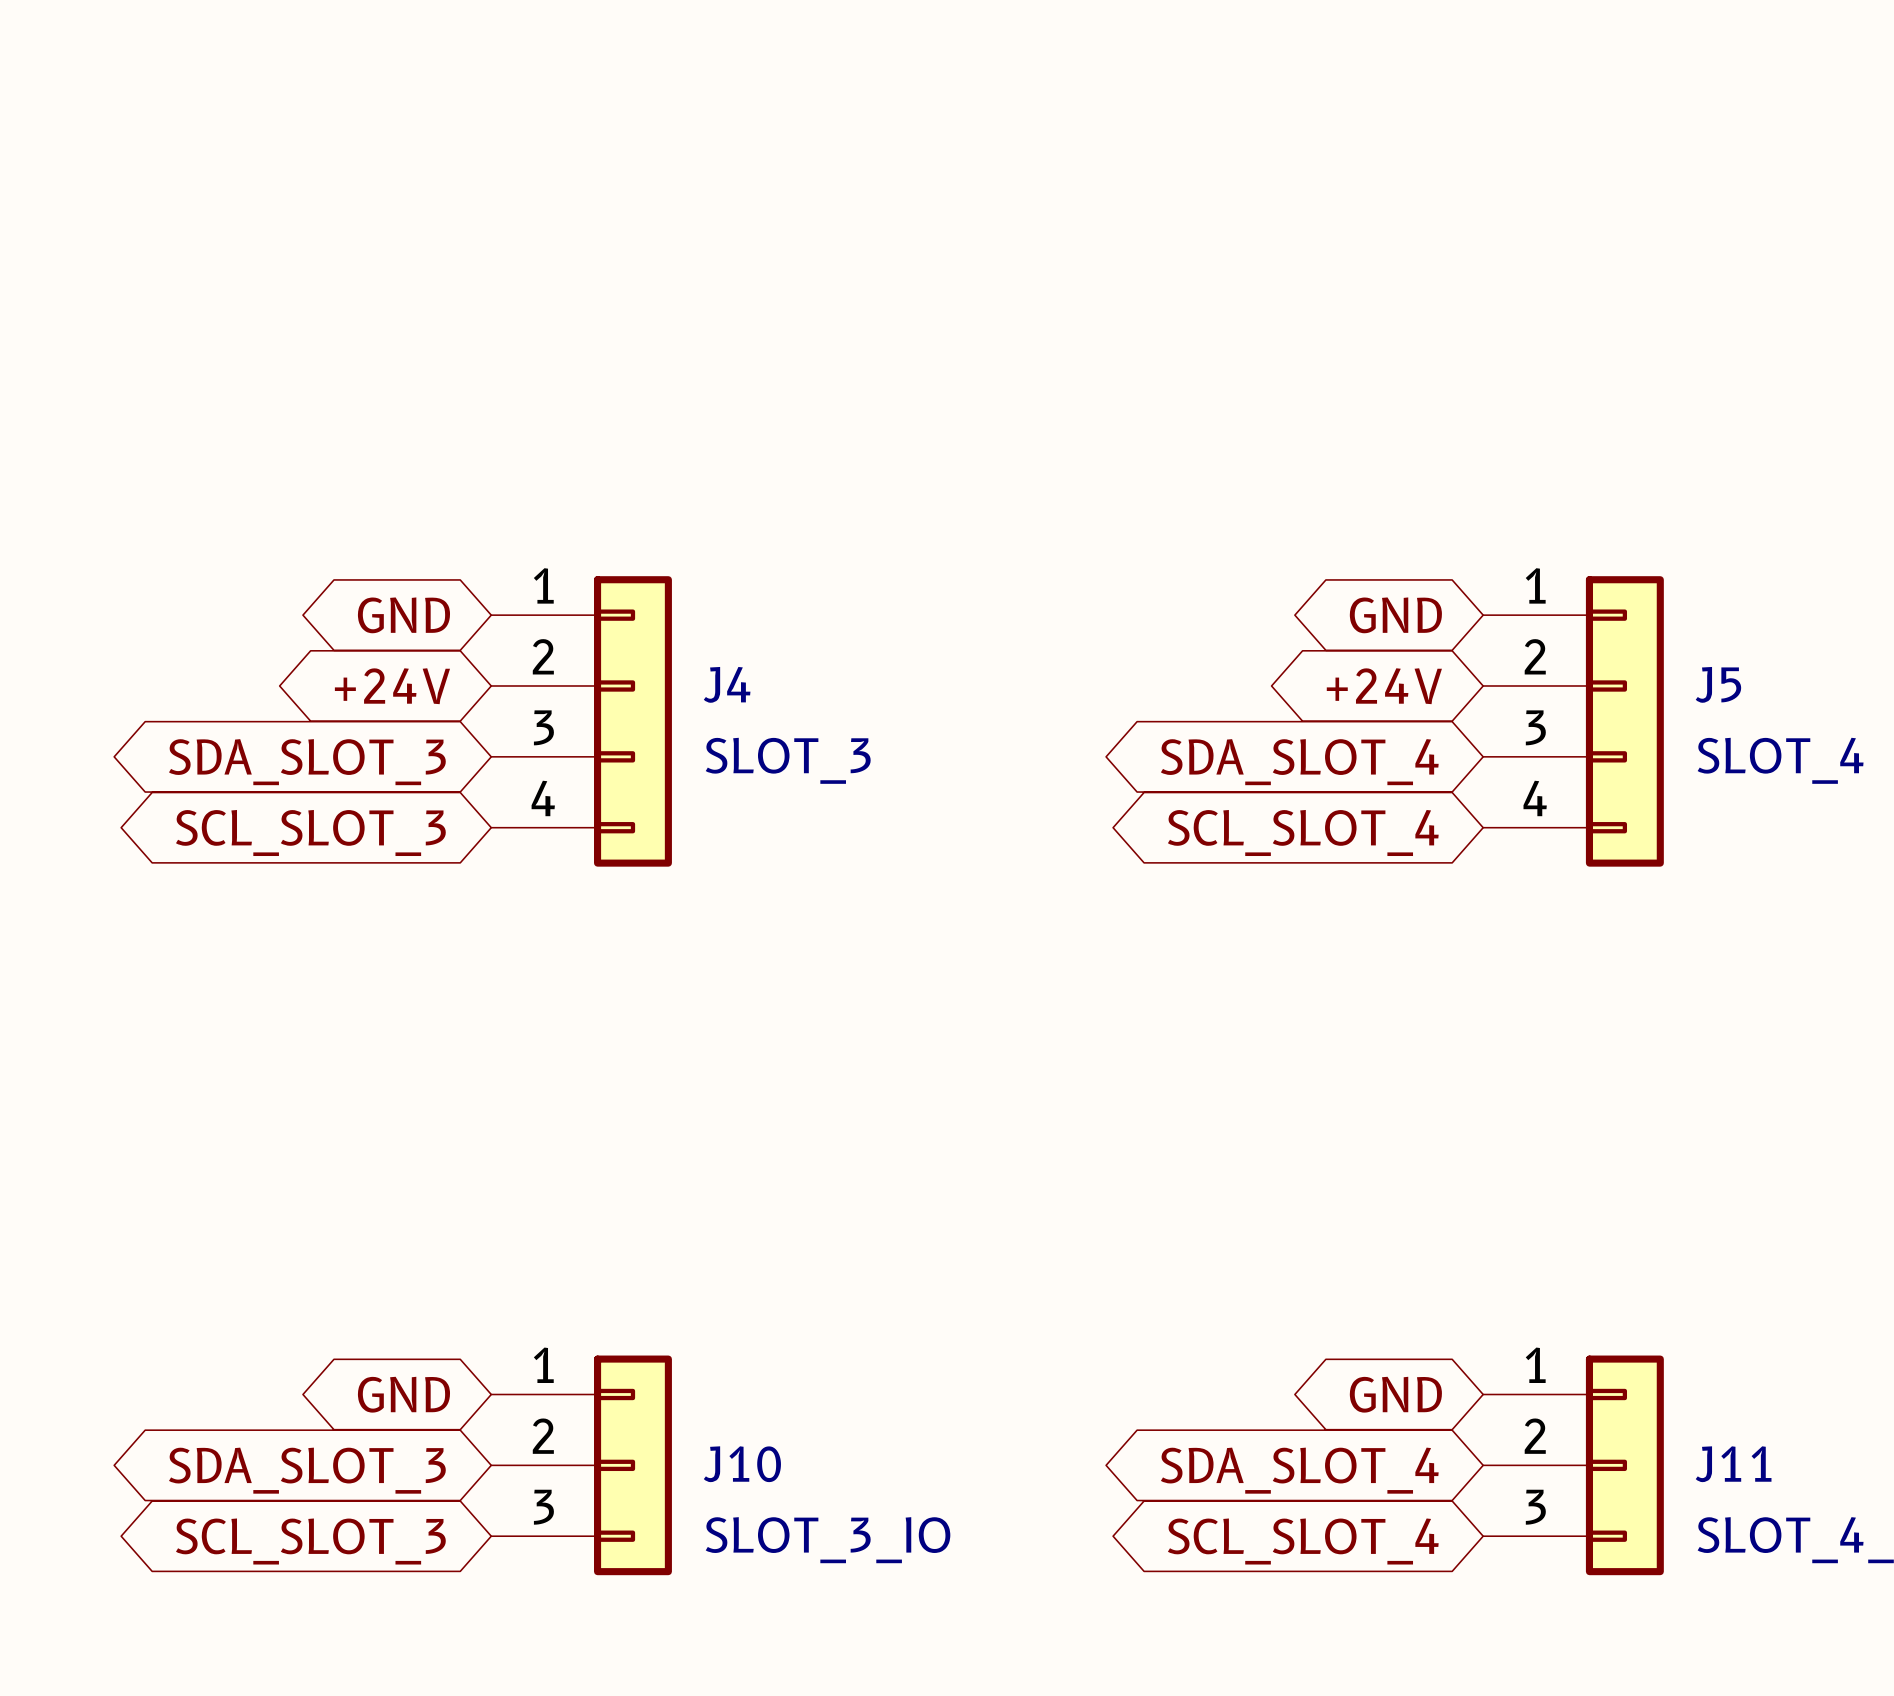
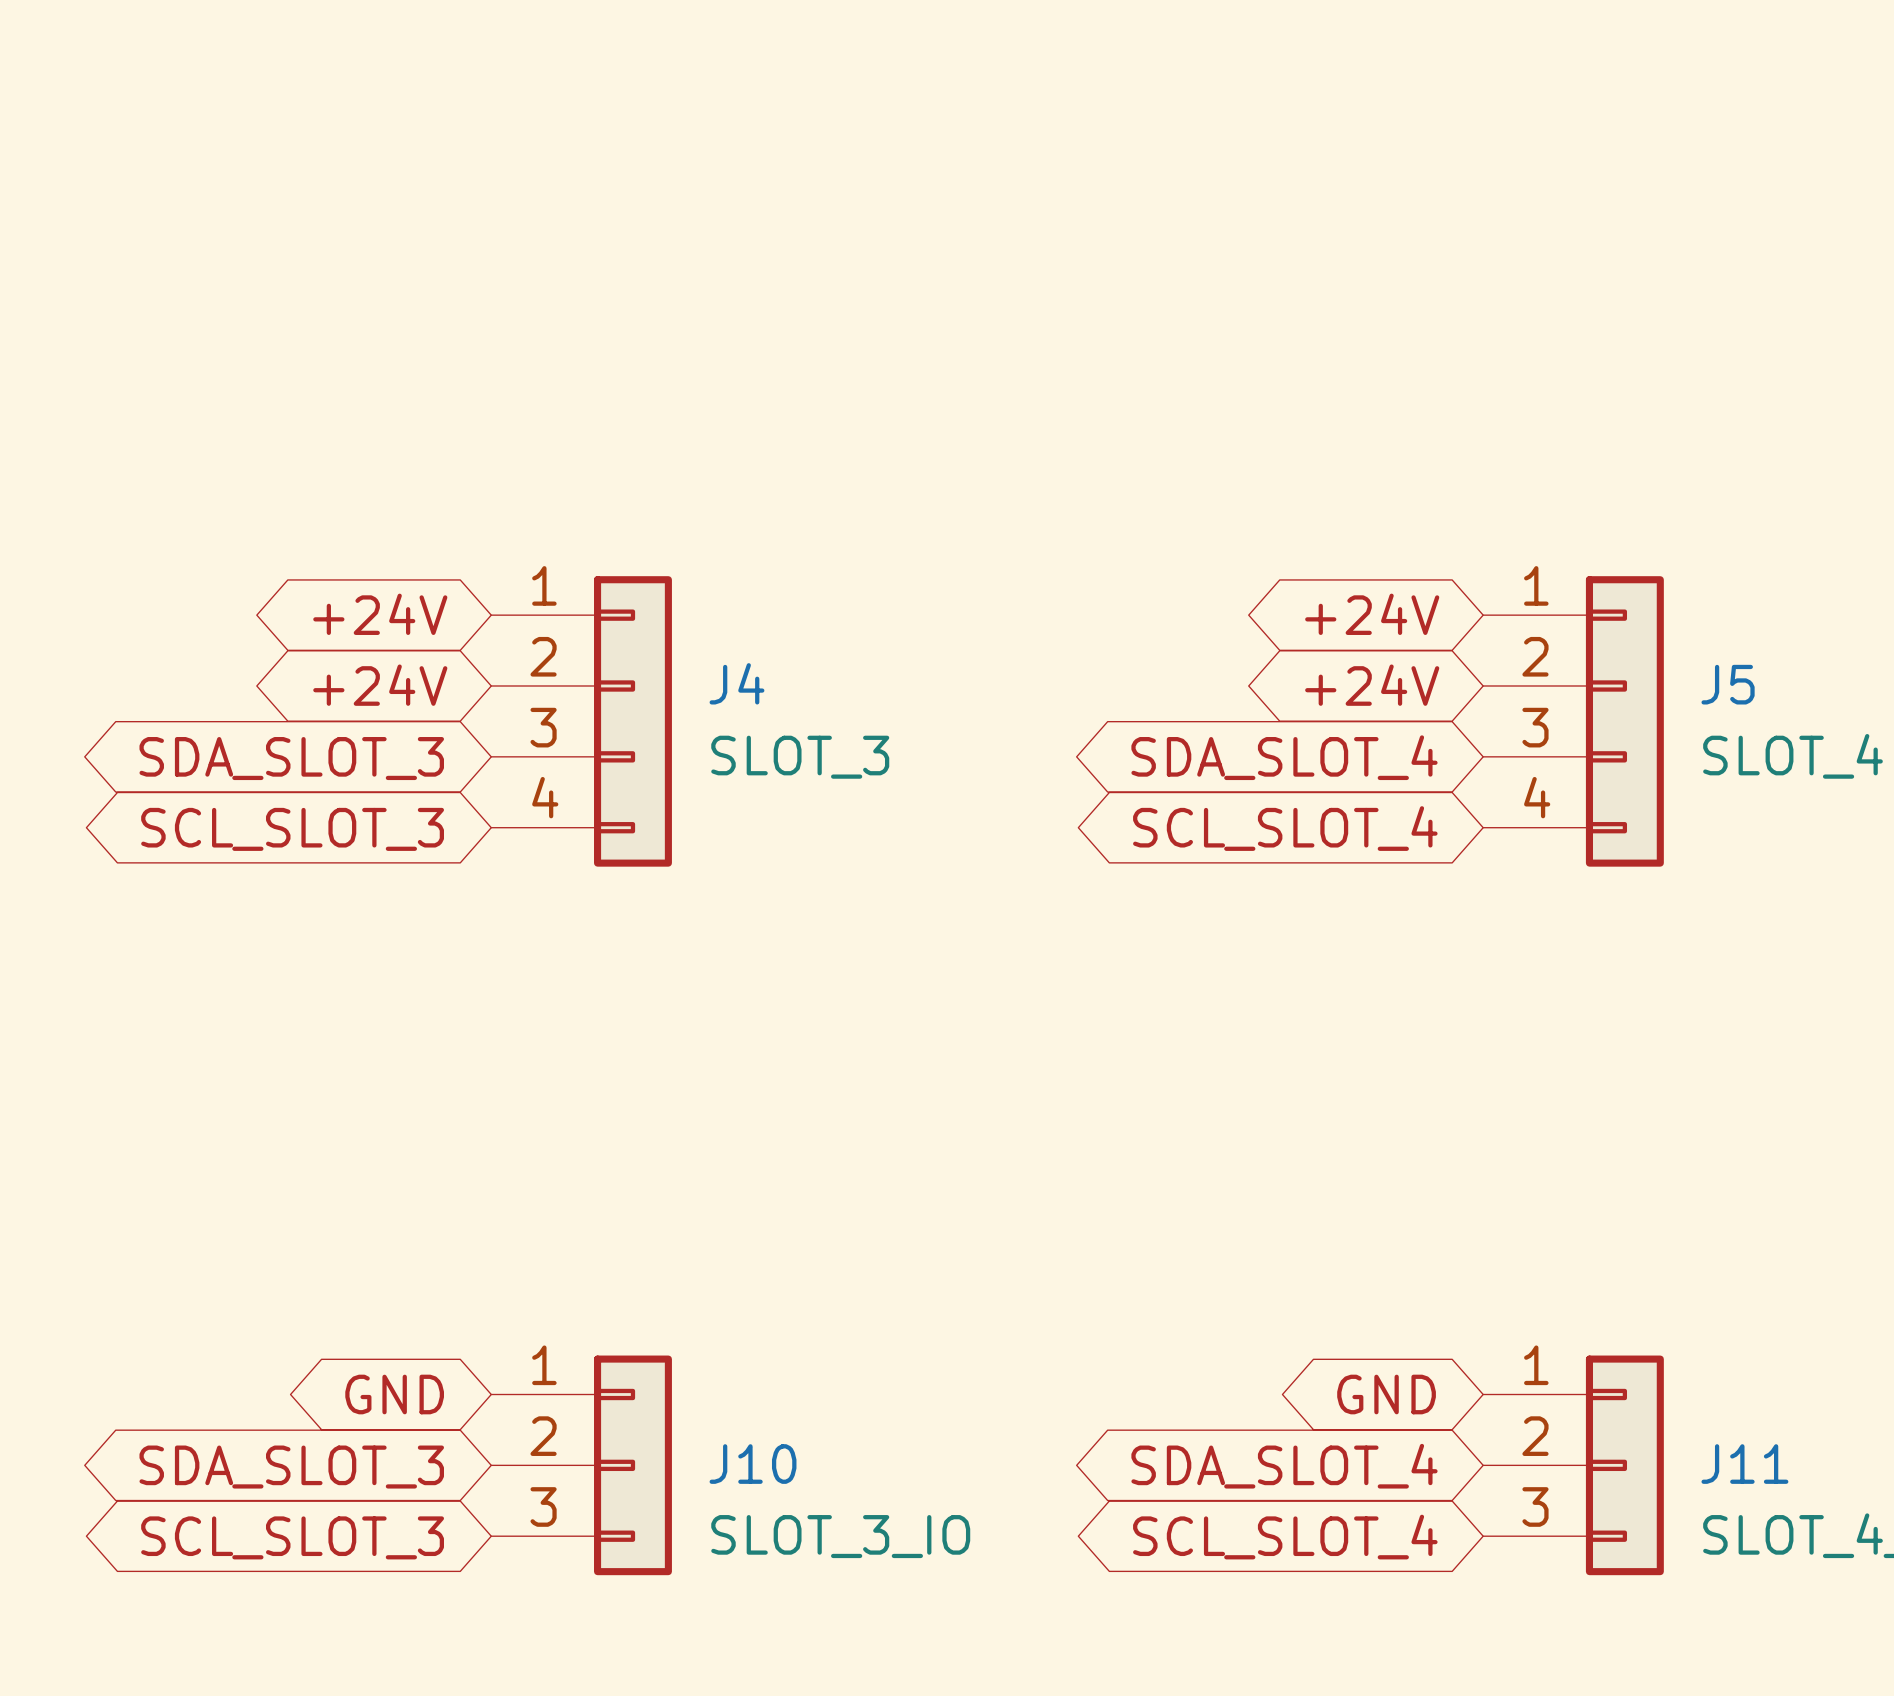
global label: GND (403, 615) -> +24V (380, 614)
global label: GND (1395, 615) -> +24V (1372, 614)

